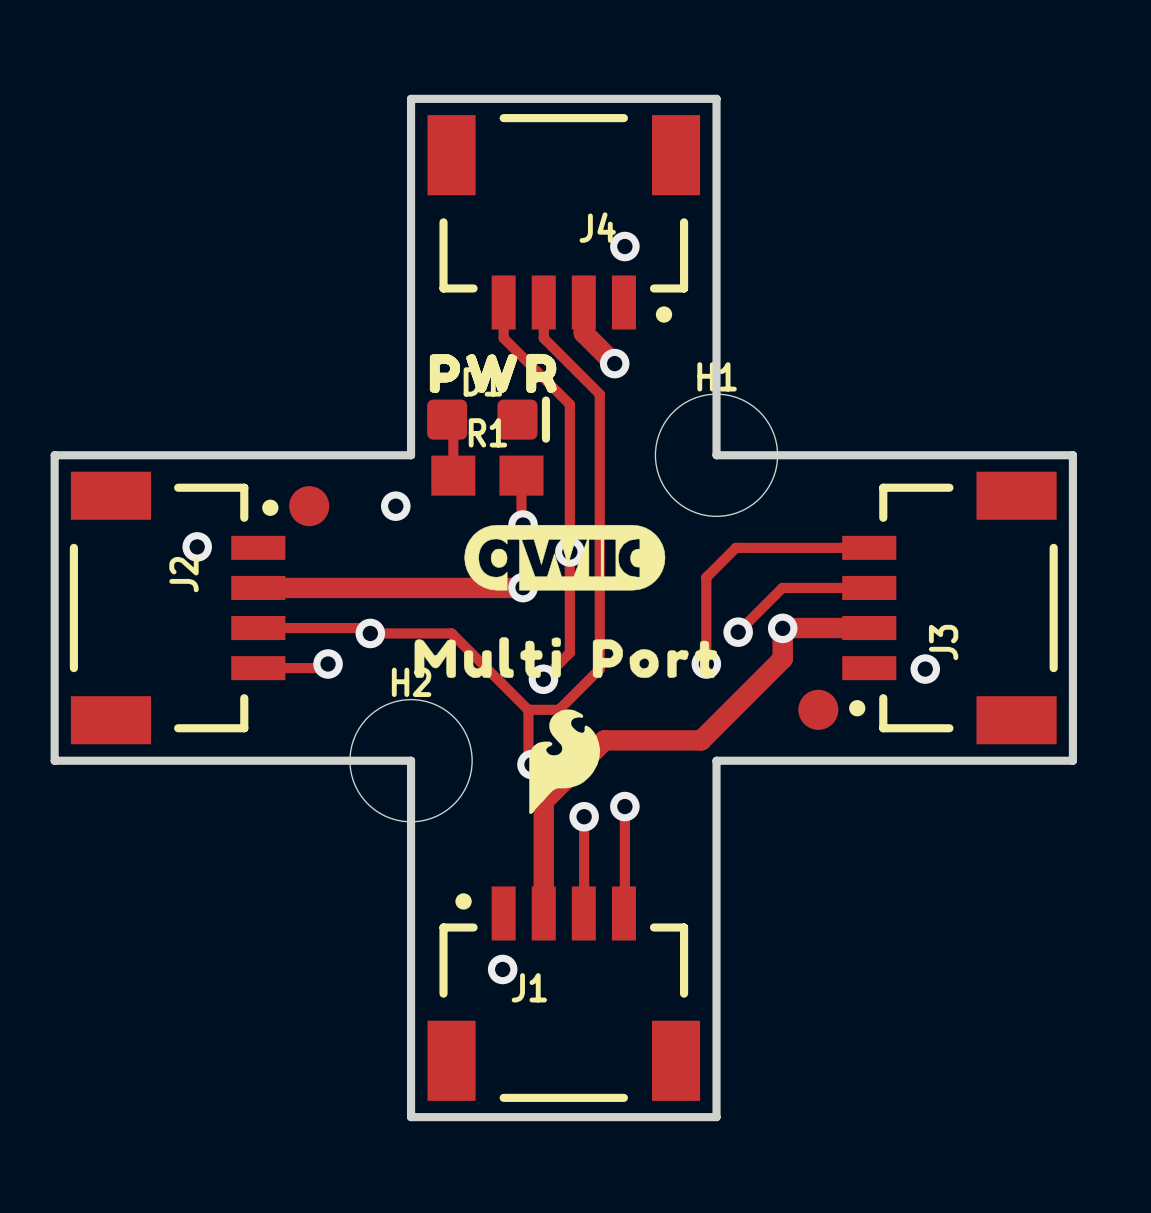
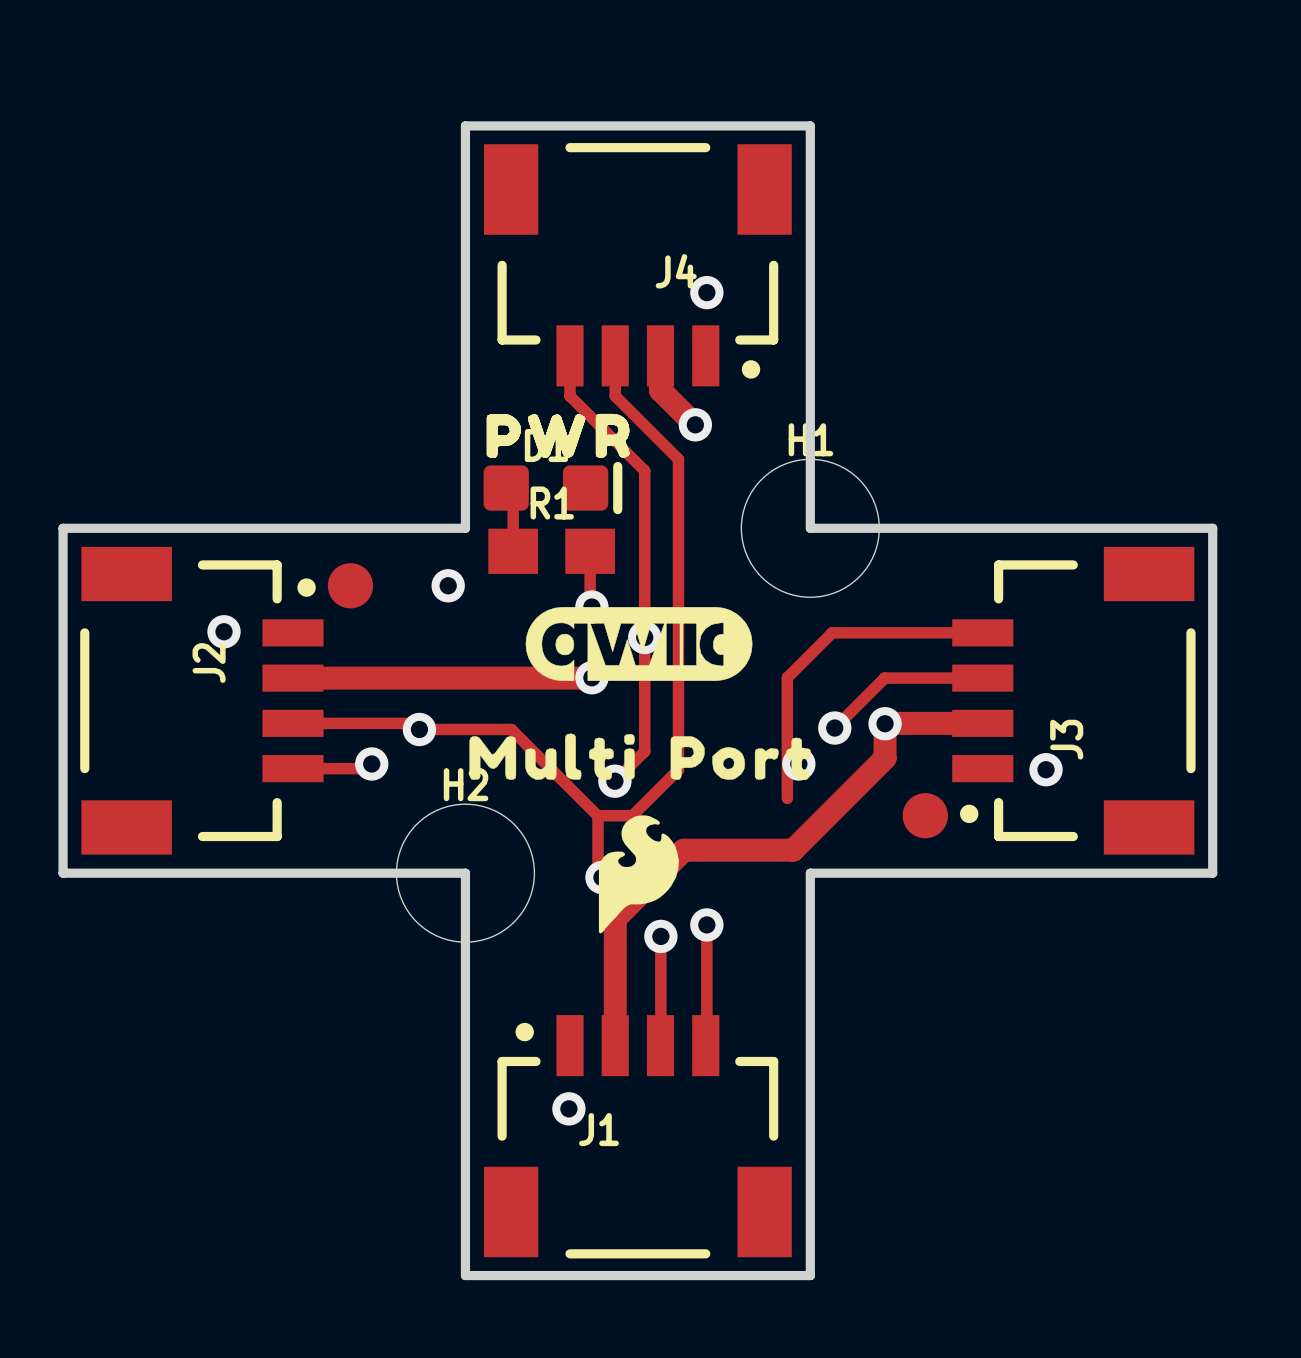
track: (706, 577) (706, 663) -> (798, 666) (787, 677) (787, 798)

